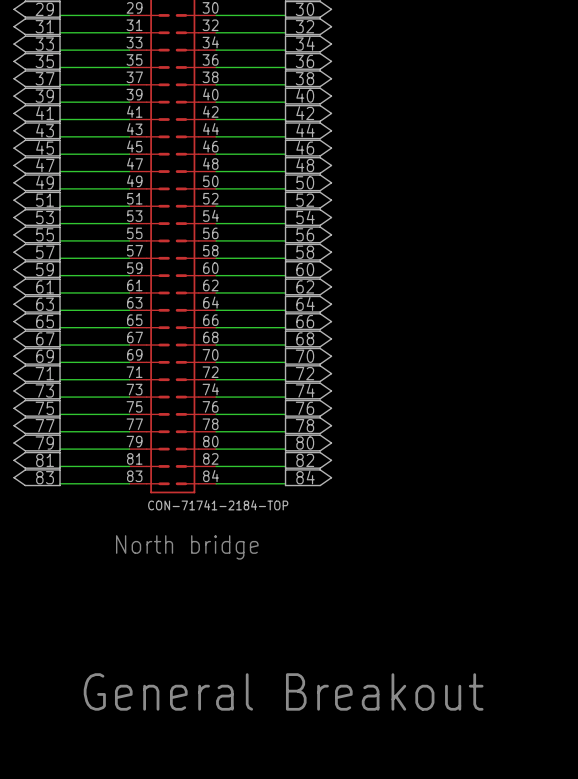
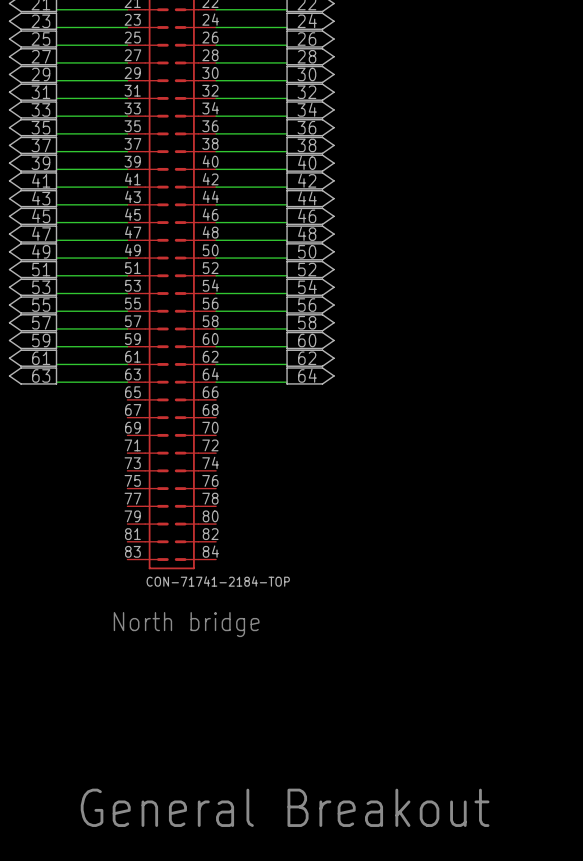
part: (37, 321) -> none
label: 65 (45, 321) -> none
label: 66 (305, 321) -> none
part: (308, 321) -> none
wire: (60, 327) (129, 327) -> none
wire: (216, 327) (285, 327) -> none
part: (37, 338) -> none
label: 67 (45, 338) -> none
label: 68 (305, 338) -> none
part: (308, 338) -> none
wire: (60, 345) (129, 345) -> none
wire: (216, 345) (285, 345) -> none
part: (37, 356) -> none
label: 69 (45, 356) -> none
label: 70 (304, 356) -> none
part: (308, 356) -> none
wire: (60, 362) (129, 362) -> none
wire: (216, 362) (285, 362) -> none
part: (37, 373) -> none
label: 71 (44, 373) -> none
label: 72 (304, 373) -> none
part: (308, 373) -> none
wire: (60, 379) (129, 379) -> none
wire: (216, 379) (285, 379) -> none
part: (37, 390) -> none
label: 73 (44, 390) -> none
label: 74 (305, 390) -> none
part: (308, 390) -> none
wire: (60, 397) (129, 397) -> none
wire: (216, 397) (285, 397) -> none
part: (37, 408) -> none
label: 75 (44, 408) -> none
label: 76 (304, 408) -> none
part: (308, 408) -> none
wire: (60, 414) (129, 414) -> none
wire: (216, 414) (285, 414) -> none
part: (37, 425) -> none
label: 77 (45, 425) -> none
label: 78 (304, 425) -> none
part: (308, 425) -> none
wire: (60, 431) (129, 431) -> none
wire: (216, 431) (285, 431) -> none
part: (37, 443) -> none
label: 79 (44, 443) -> none
label: 80 (305, 443) -> none
part: (308, 443) -> none
wire: (60, 449) (129, 449) -> none
wire: (216, 449) (285, 449) -> none
part: (37, 460) -> none
label: 81 (45, 460) -> none
label: 82 (305, 460) -> none
part: (308, 460) -> none
wire: (60, 466) (129, 466) -> none
wire: (216, 466) (285, 466) -> none
part: (37, 477) -> none
label: 83 (45, 477) -> none
label: 84 (305, 477) -> none
part: (308, 477) -> none
wire: (60, 483) (129, 483) -> none
wire: (216, 483) (285, 483) -> none
text position: General Breakout (283, 691) -> General Breakout (285, 807)

